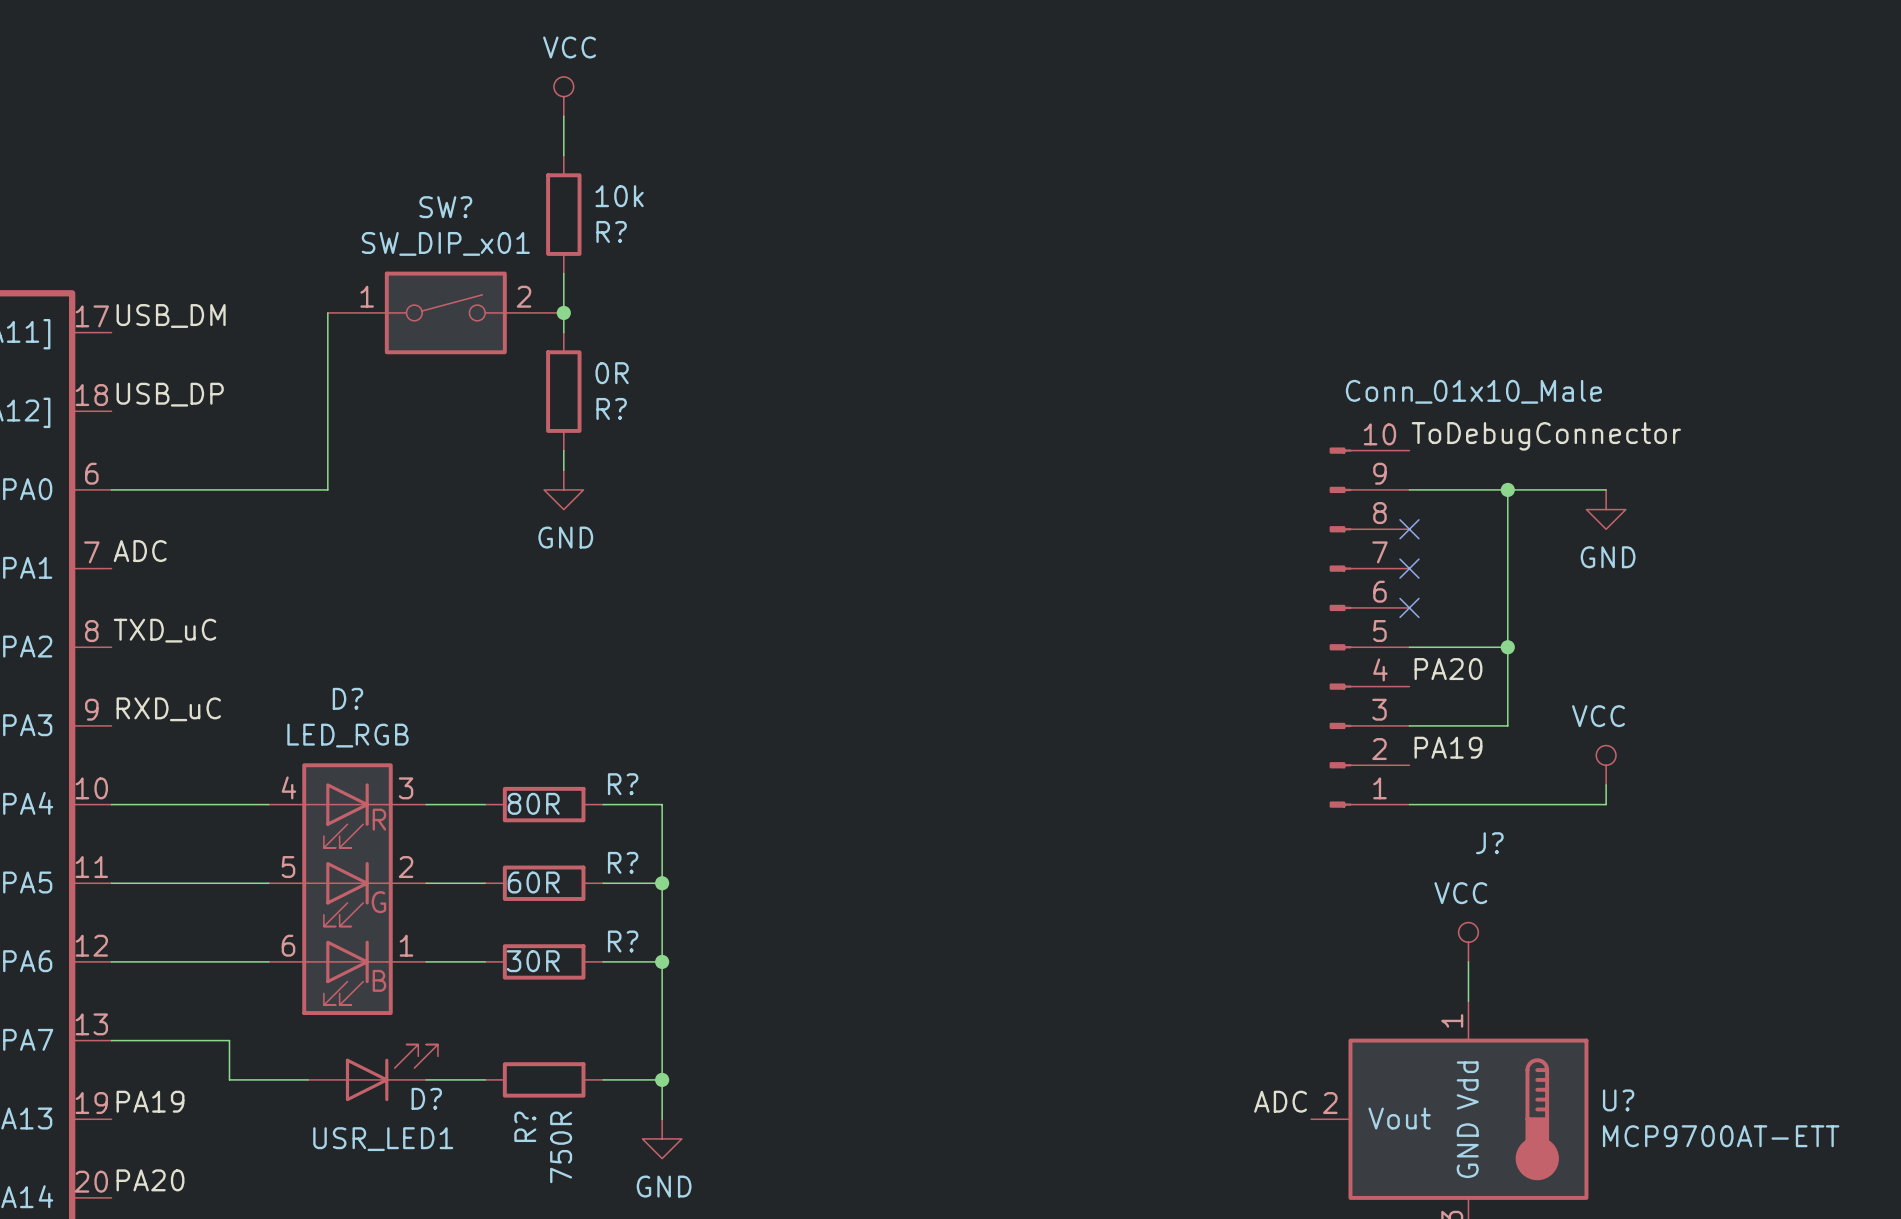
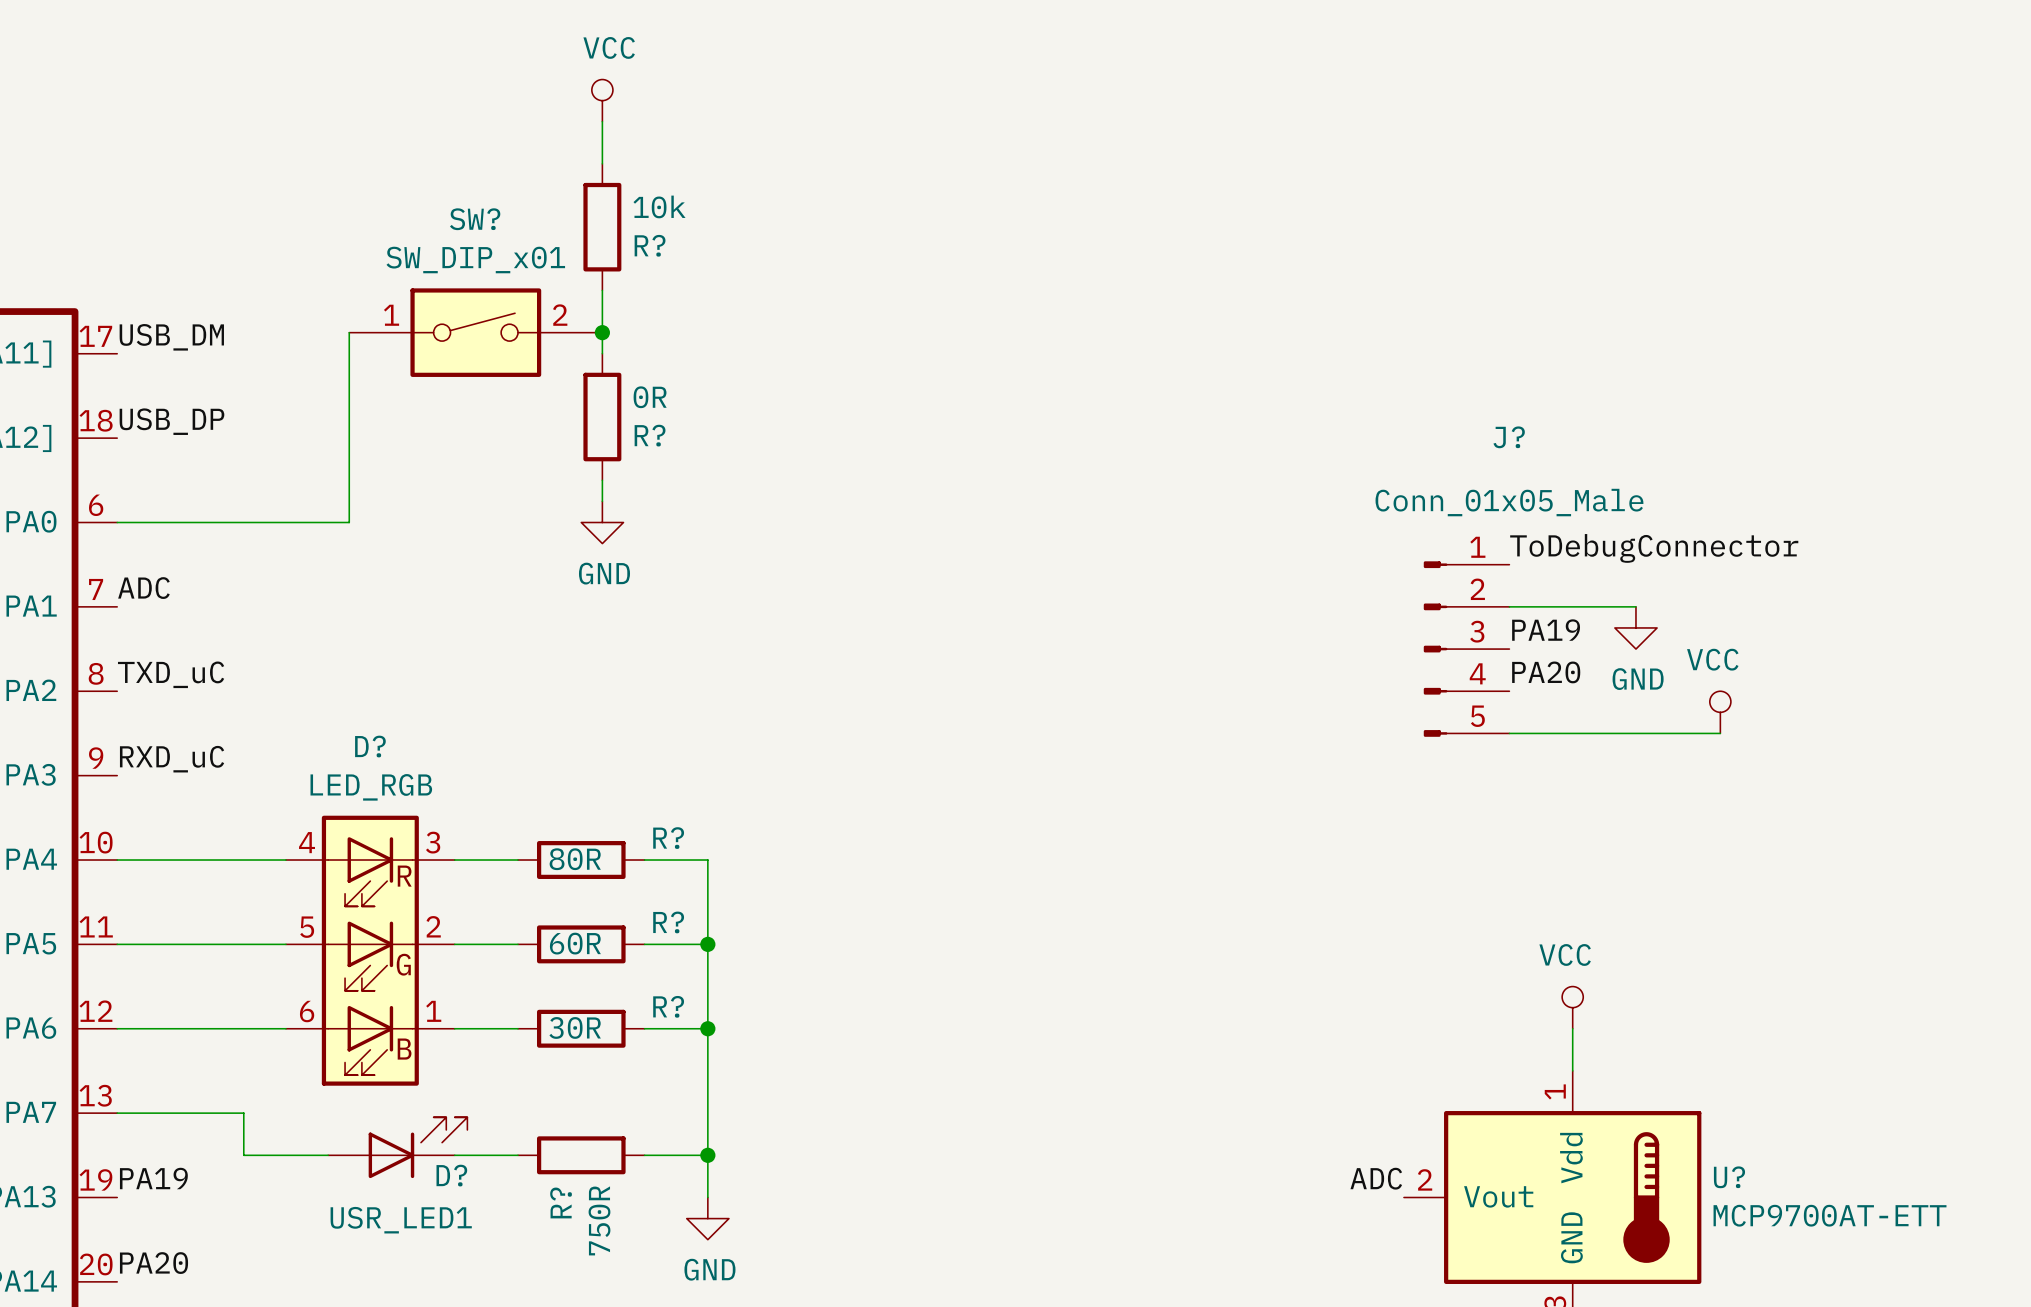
label position: ToDebugConnector (1546, 436) -> ToDebugConnector (1654, 548)
wire: (1409, 489) (1606, 489) -> (1509, 733) (1720, 733)
wire: (1507, 489) (1507, 725) (1409, 725) -> none
junction: (1507, 489) -> none
power symbol position: GND (1606, 509) -> GND (1635, 627)
no-connect mark: (1409, 529) -> none
wire: none -> (1509, 606) (1635, 606)
no-connect mark: (1409, 568) -> none
J?: none -> Conn_01x05_Male (1466, 649)
no-connect mark: (1409, 607) -> none
J?: Conn_01x10_Male (1369, 627) -> none
wire: (1409, 647) (1507, 647) -> none
junction: (1507, 647) -> none
label position: PA20 (1448, 669) -> PA20 (1546, 672)
label position: PA19 (1448, 747) -> PA19 (1546, 630)
power symbol position: VCC (1606, 765) -> VCC (1720, 712)
wire: (1606, 784) (1606, 804) (1409, 804) -> none

